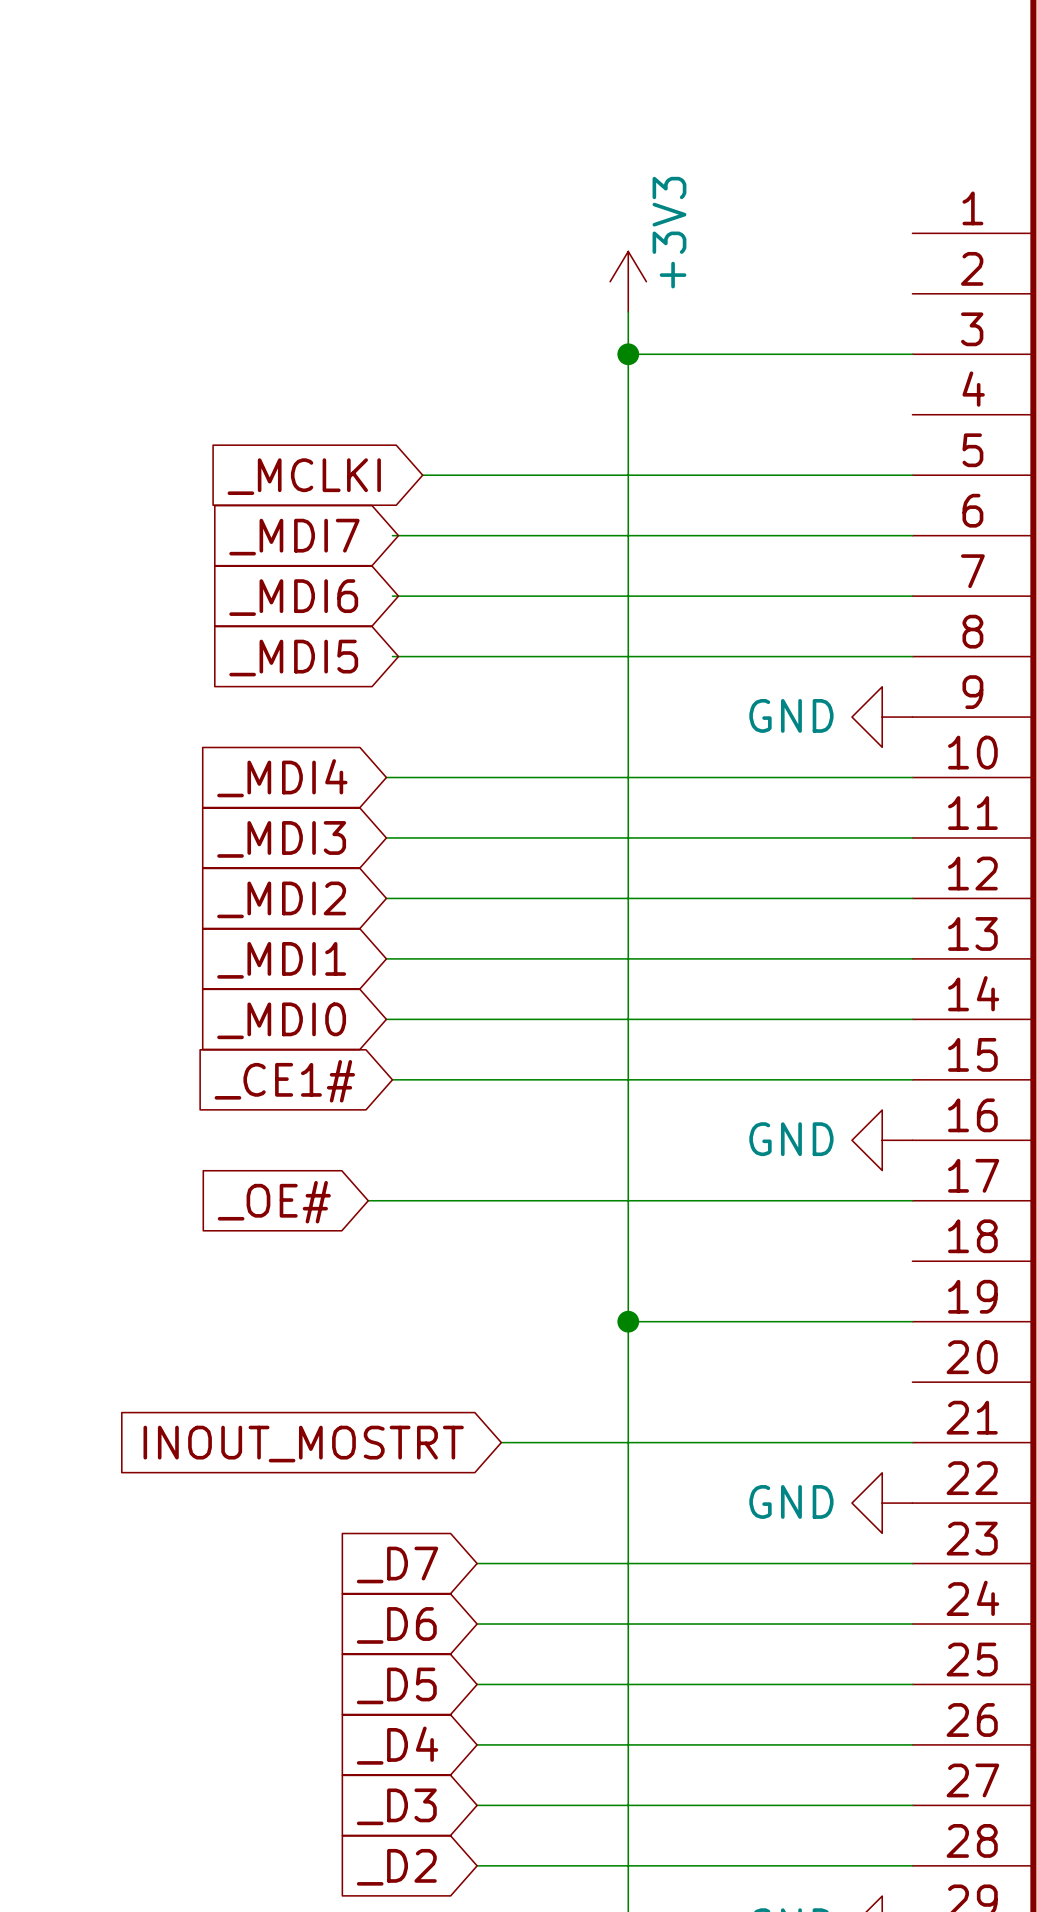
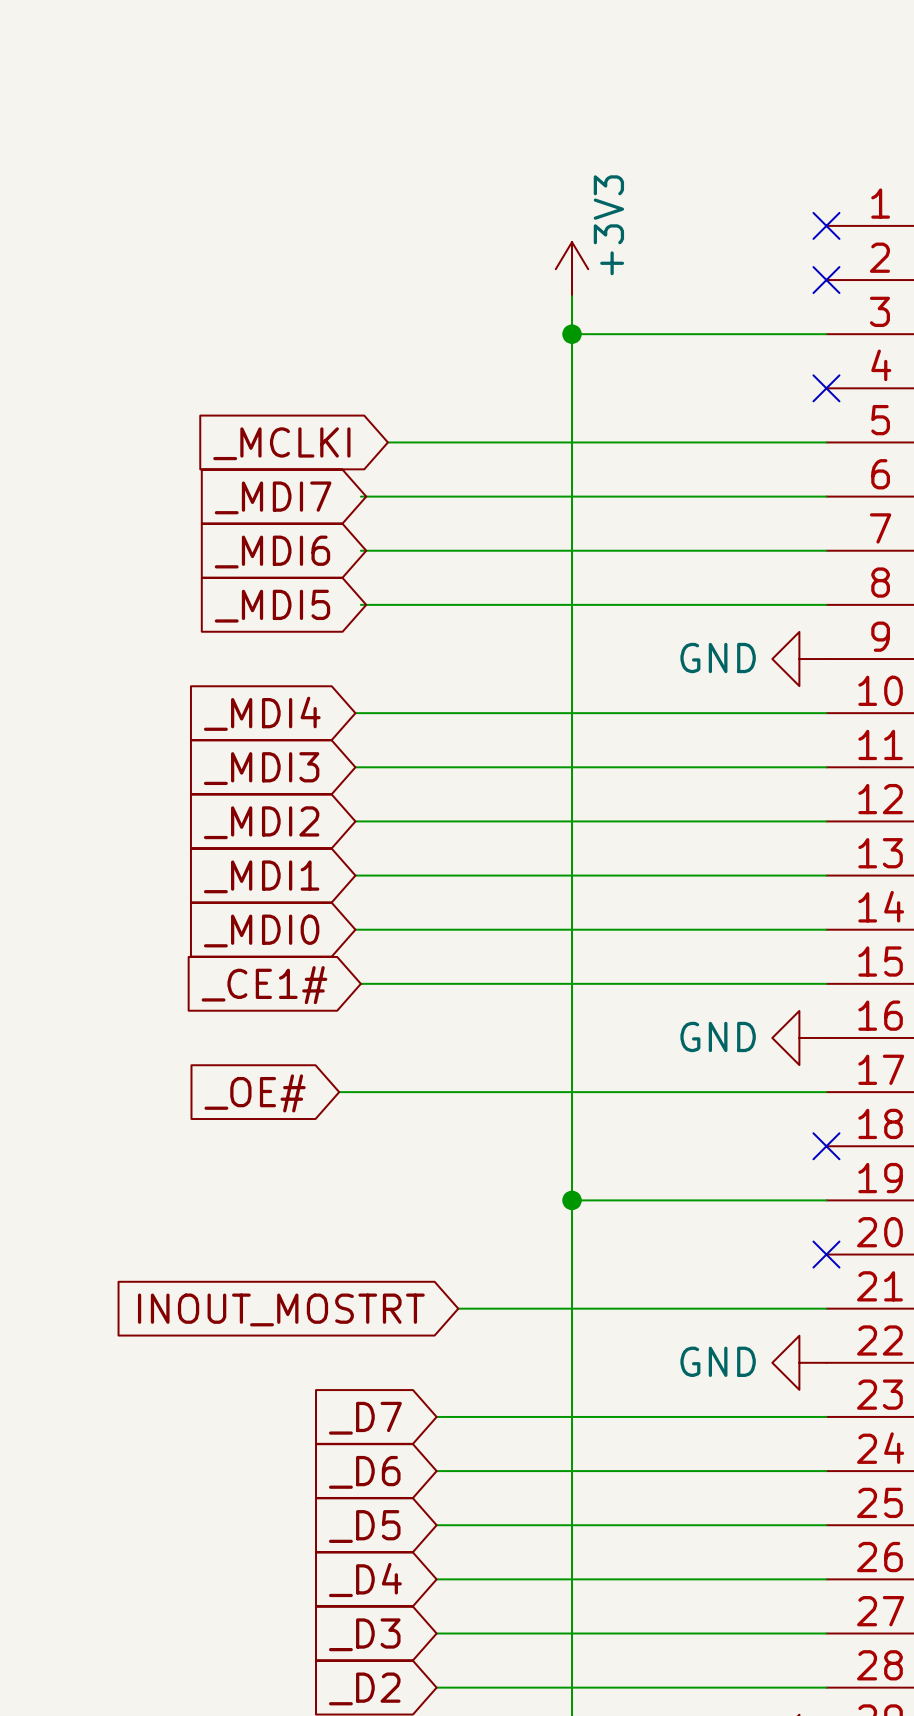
no-connect mark: none -> (826, 225)
no-connect mark: none -> (826, 280)
no-connect mark: none -> (826, 388)
no-connect mark: none -> (826, 1146)
no-connect mark: none -> (826, 1254)

